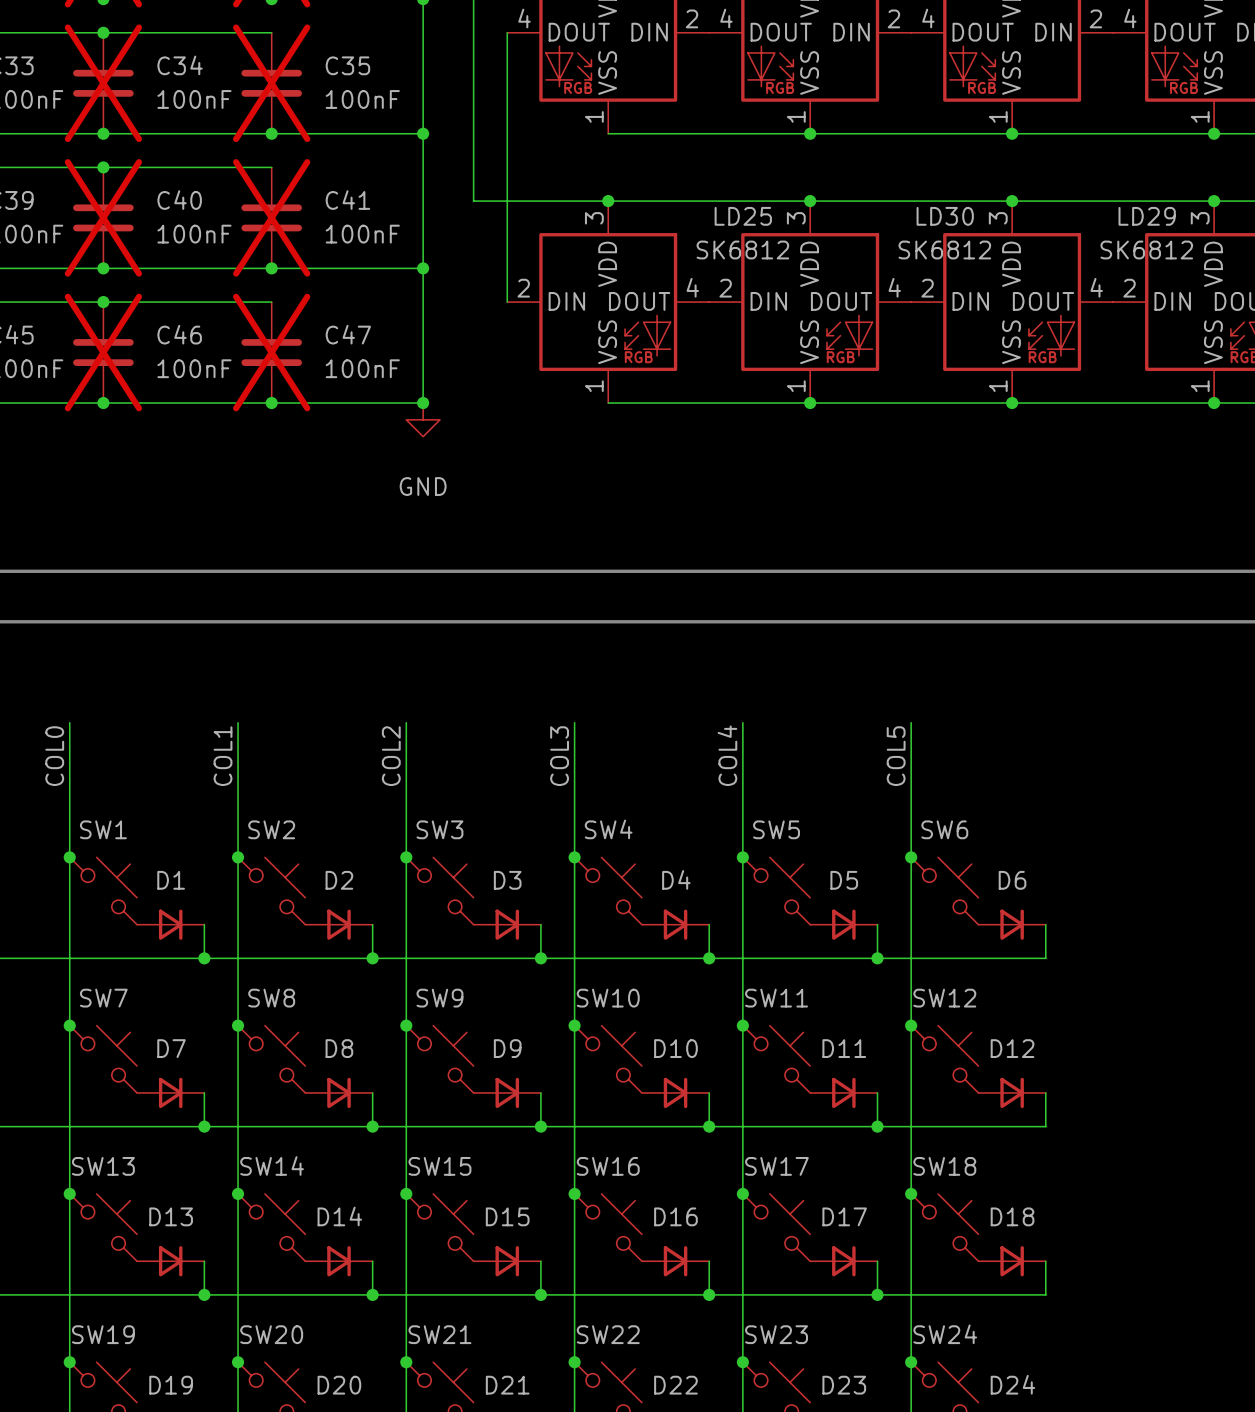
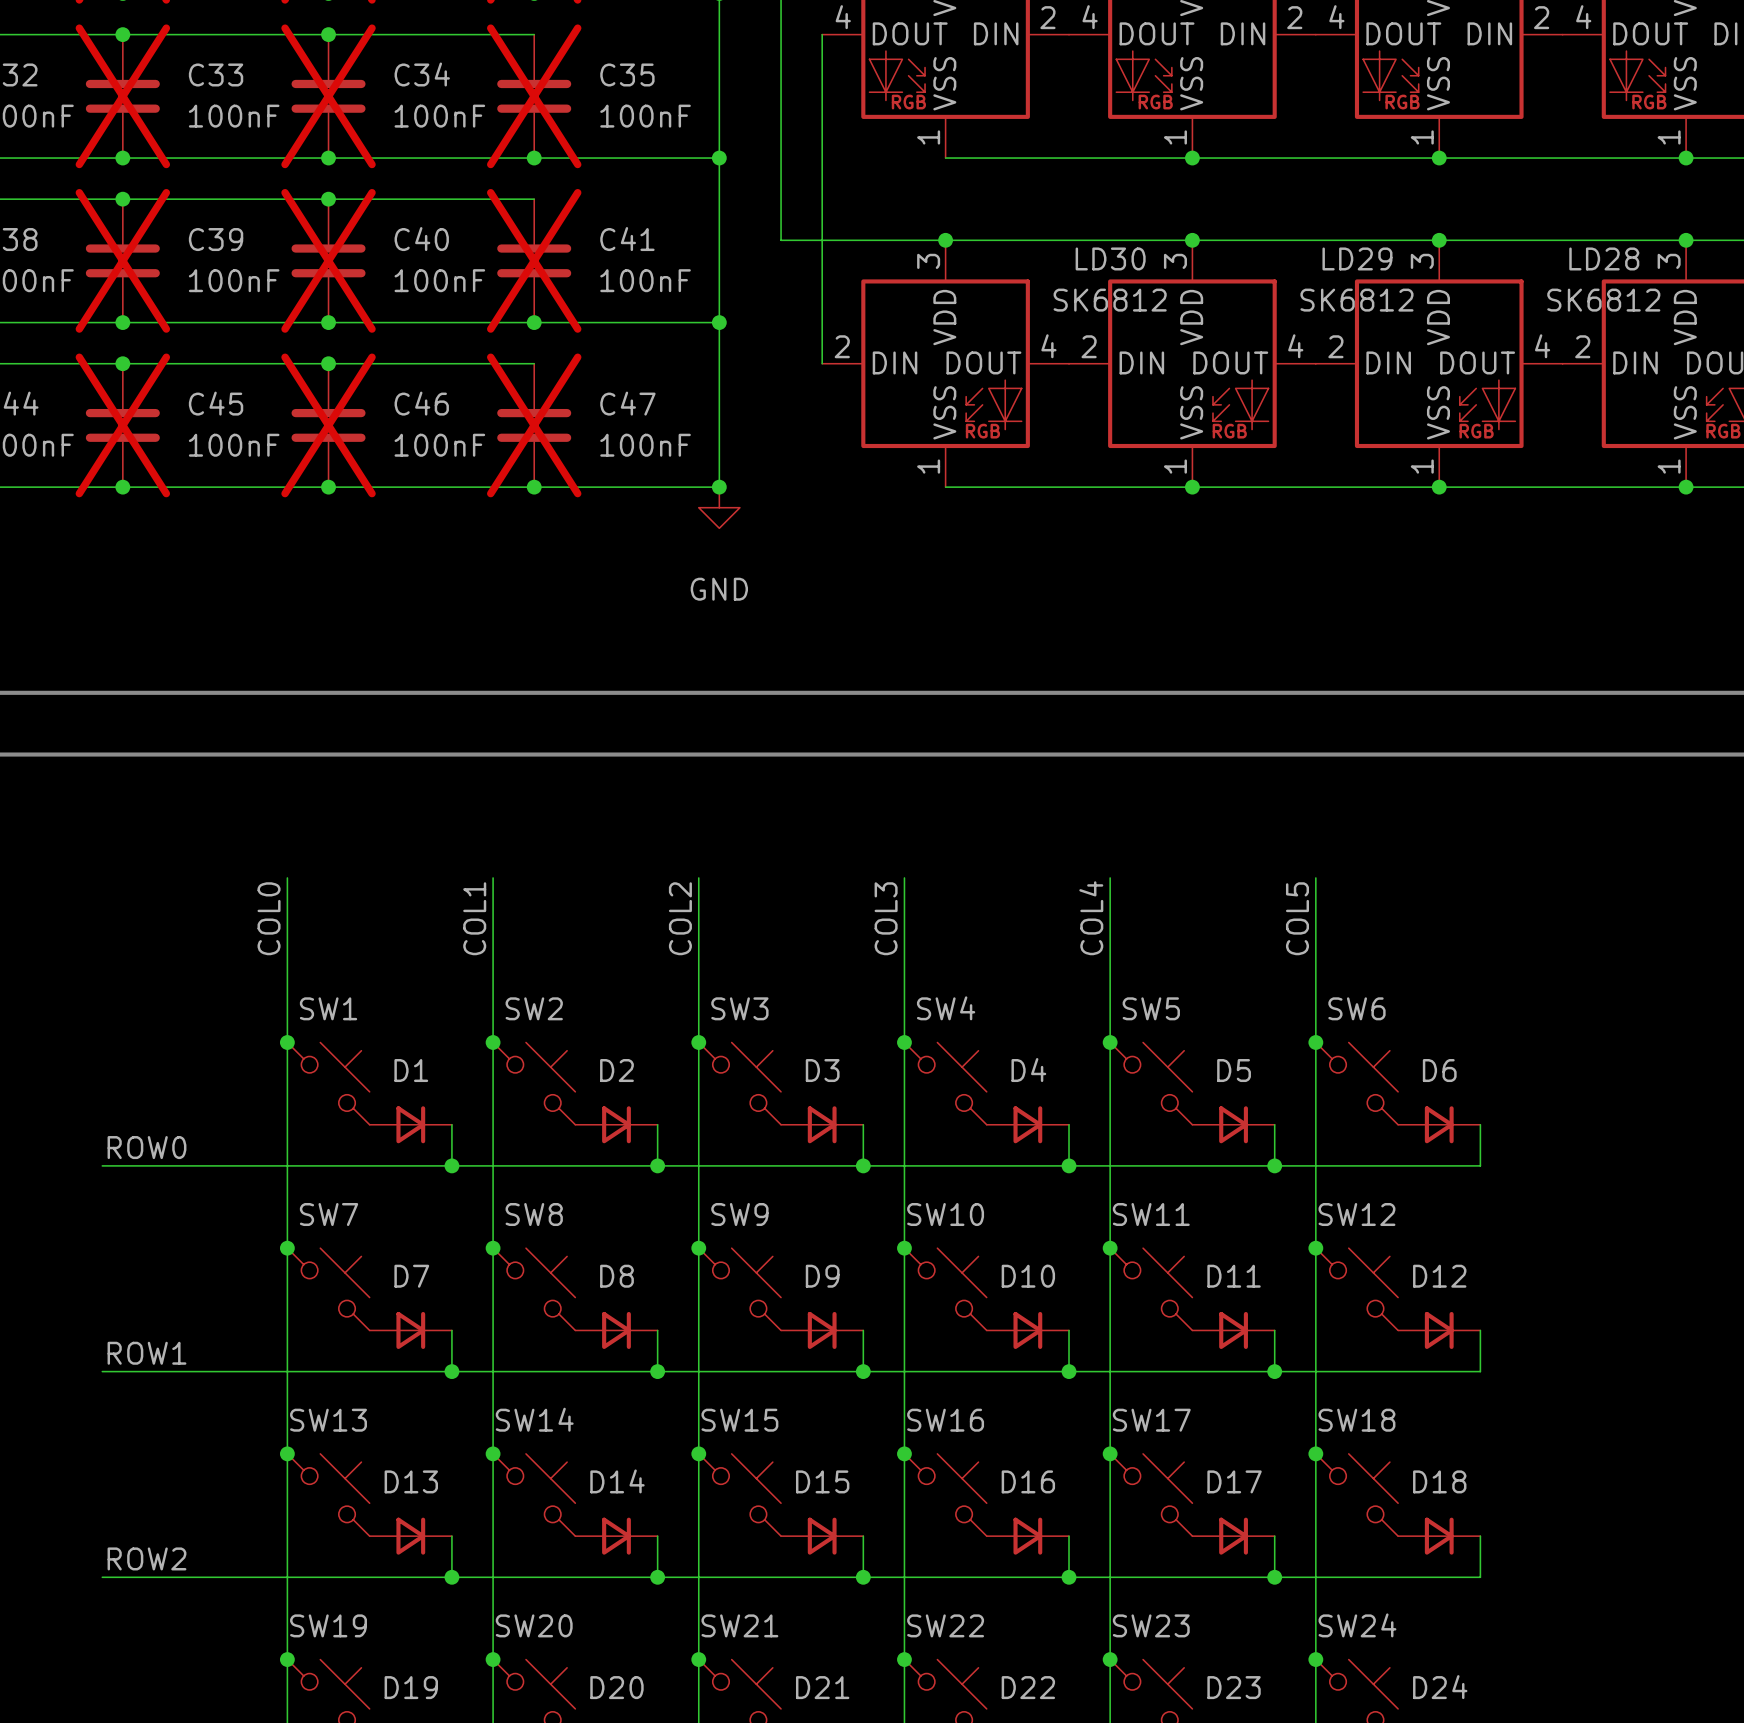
LD25 name: LD25 (743, 216) -> LD30 (1110, 258)
LD30 name: LD30 (945, 216) -> LD29 (1357, 258)
LD29 name: LD29 (1147, 216) -> LD28 (1604, 258)

